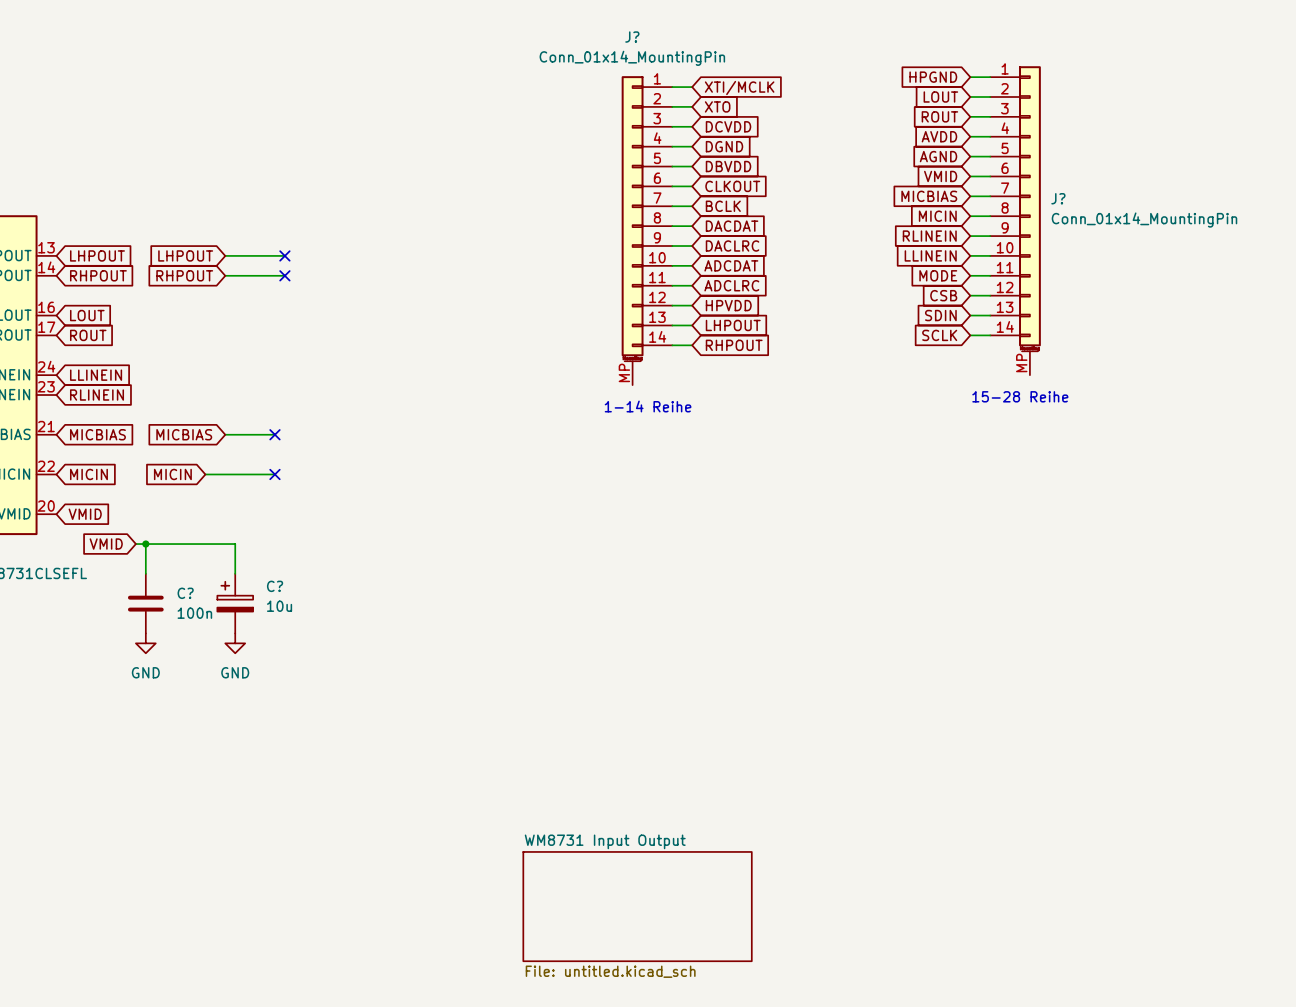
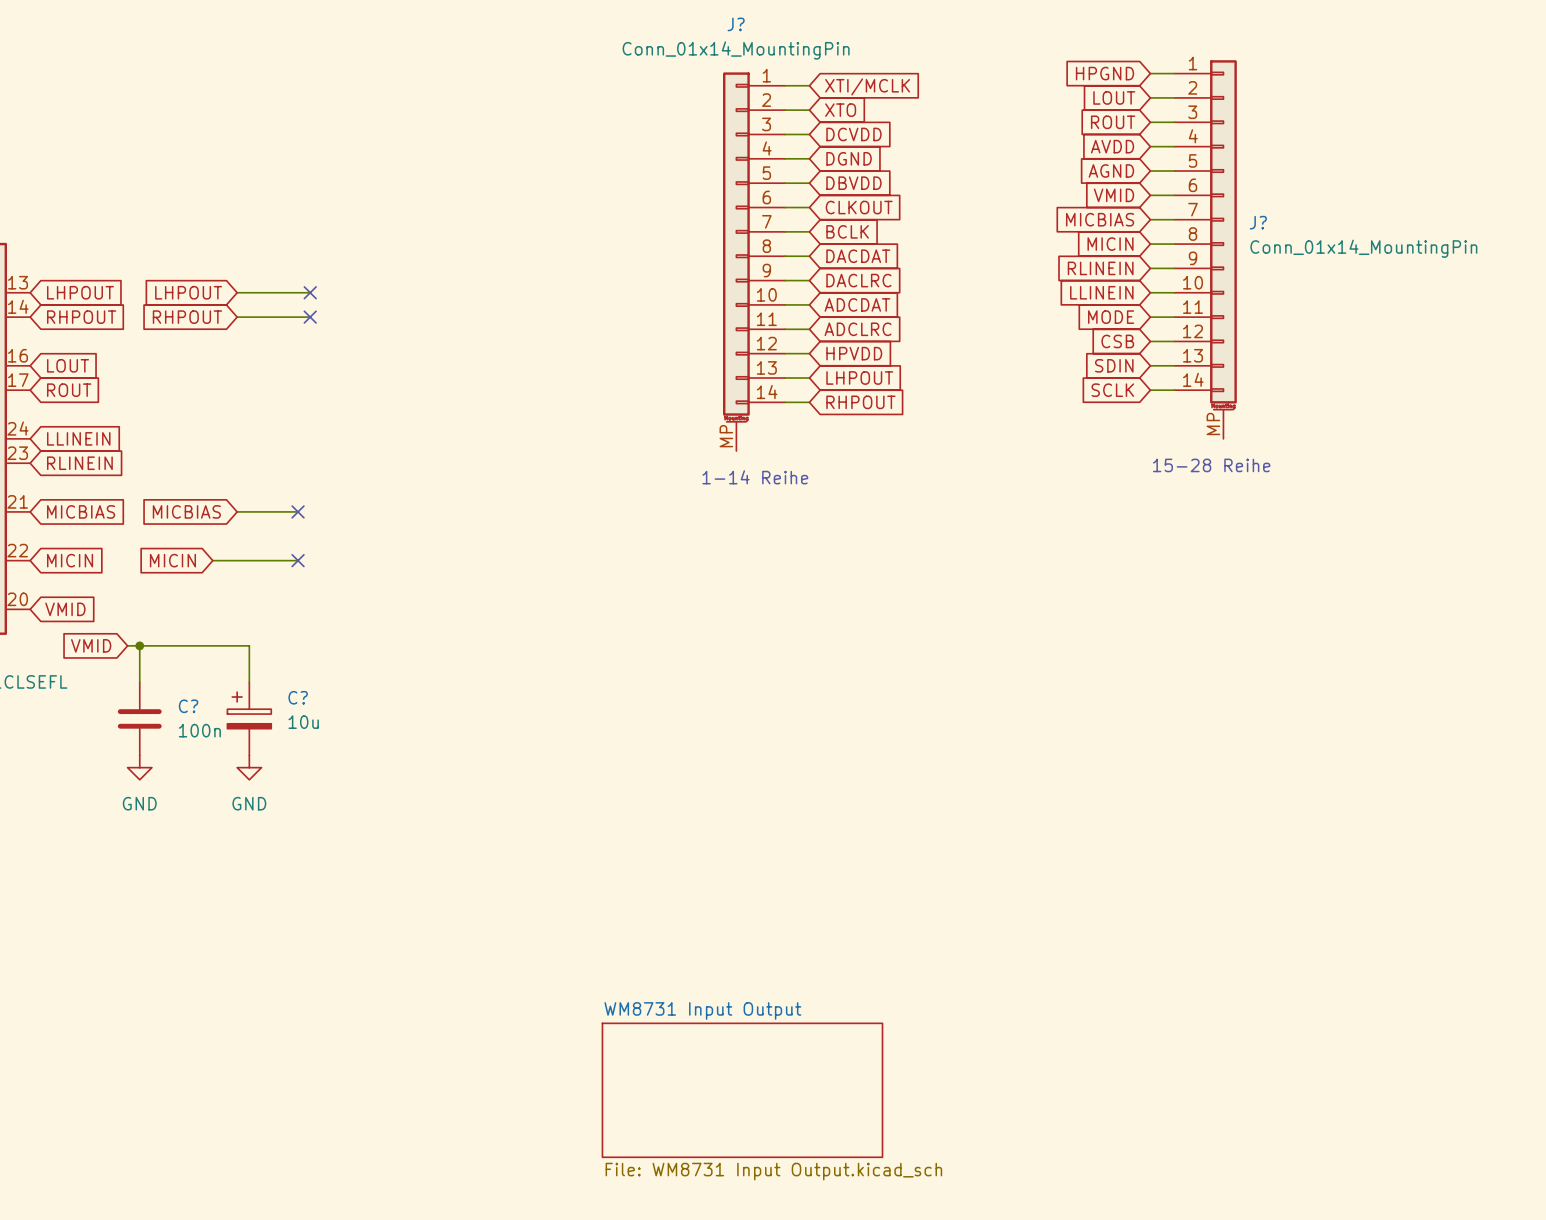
sheet WM8731 Input Output value: File: untitled.kicad_sch (610, 971) -> File: WM8731 Input Output.kicad_sch (773, 1171)

